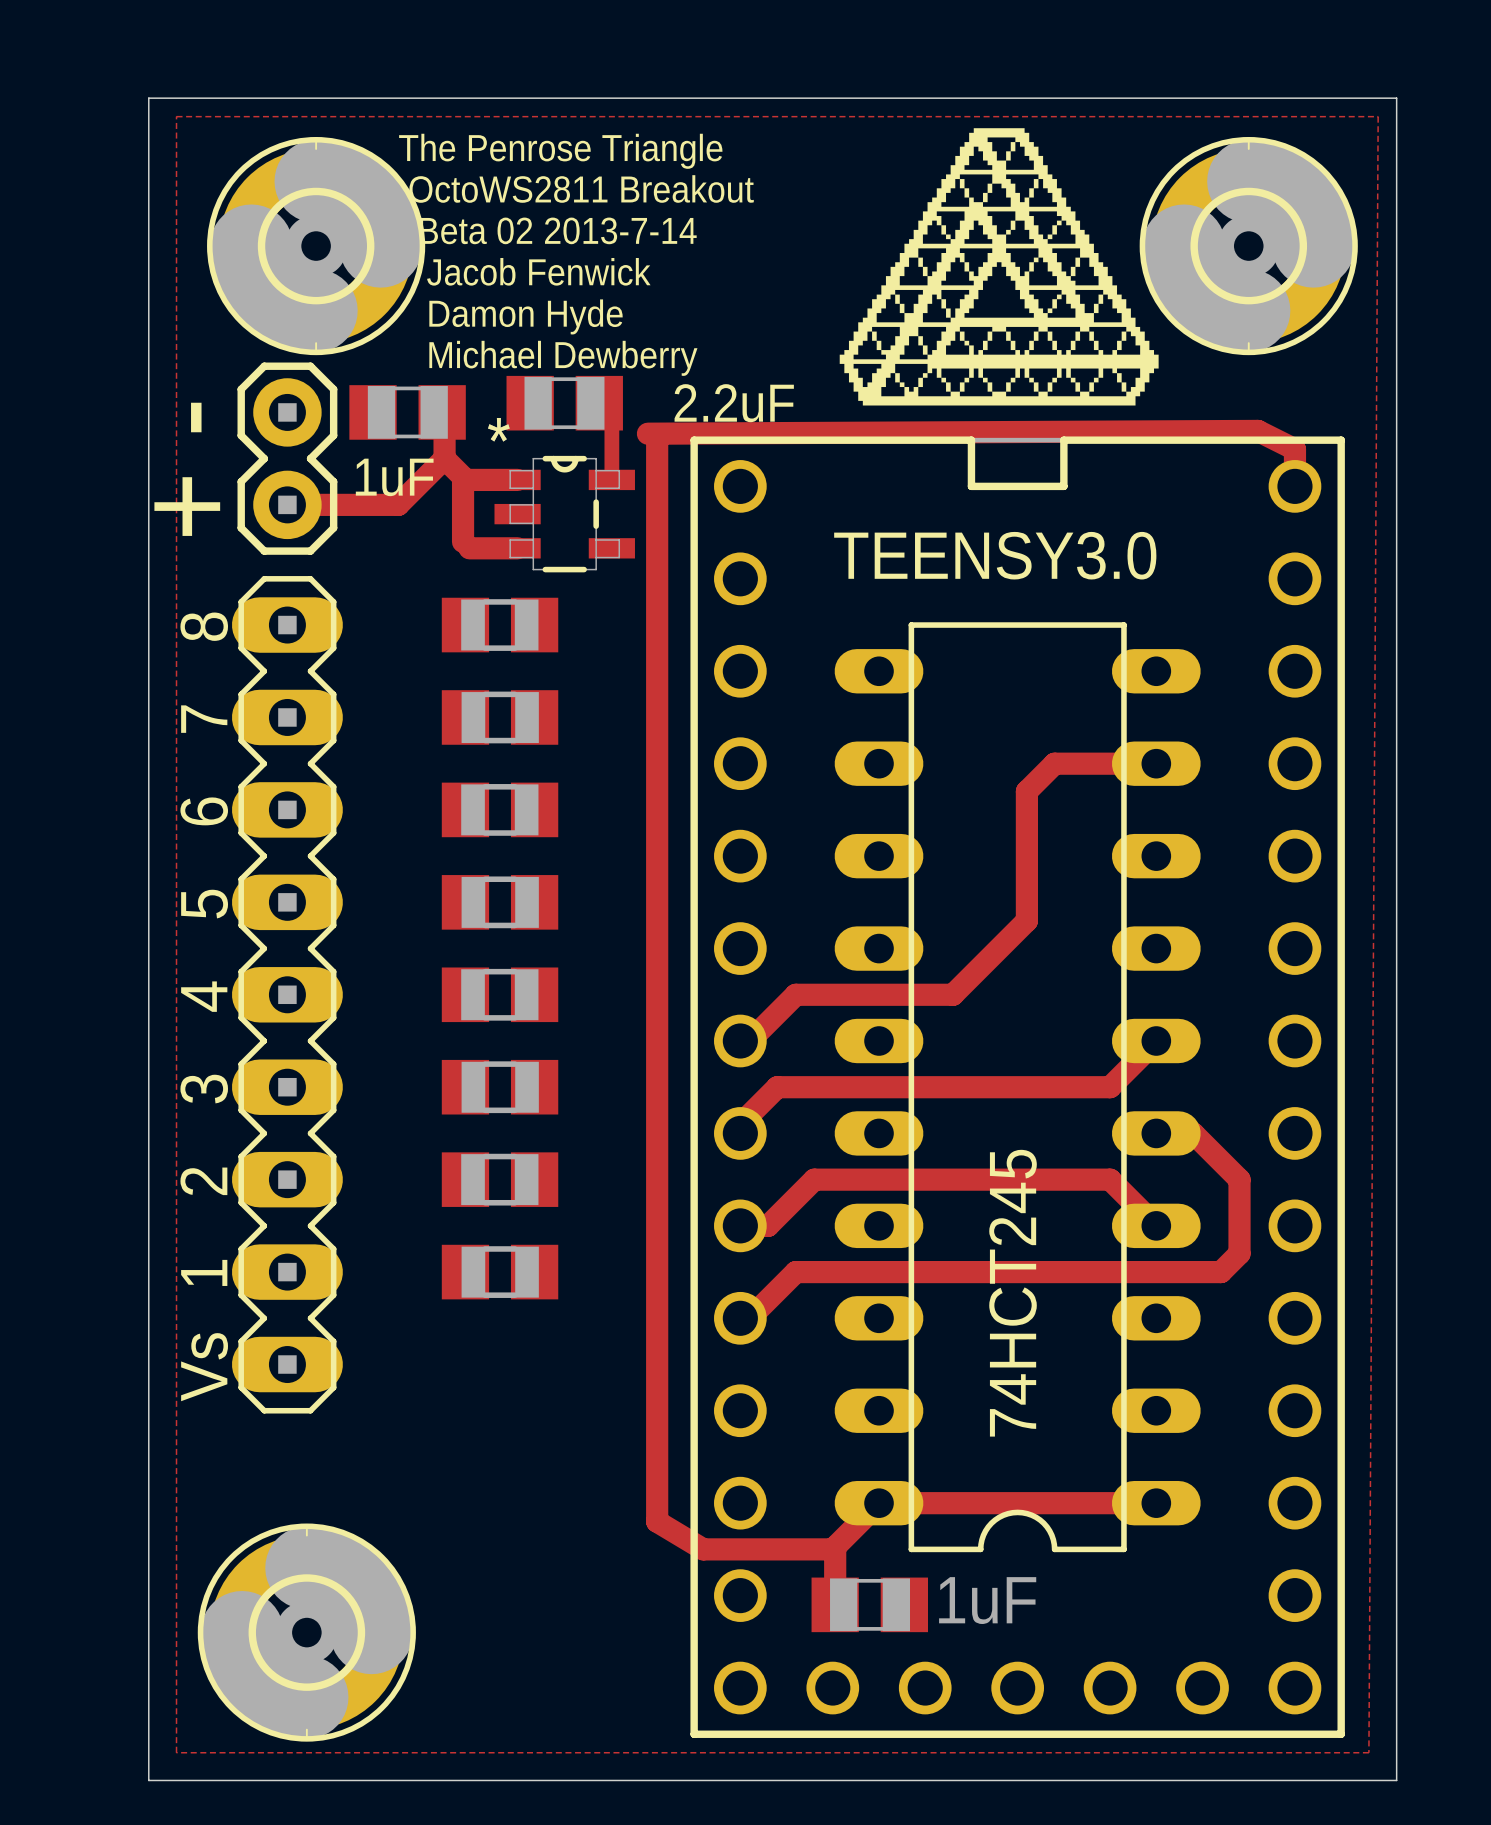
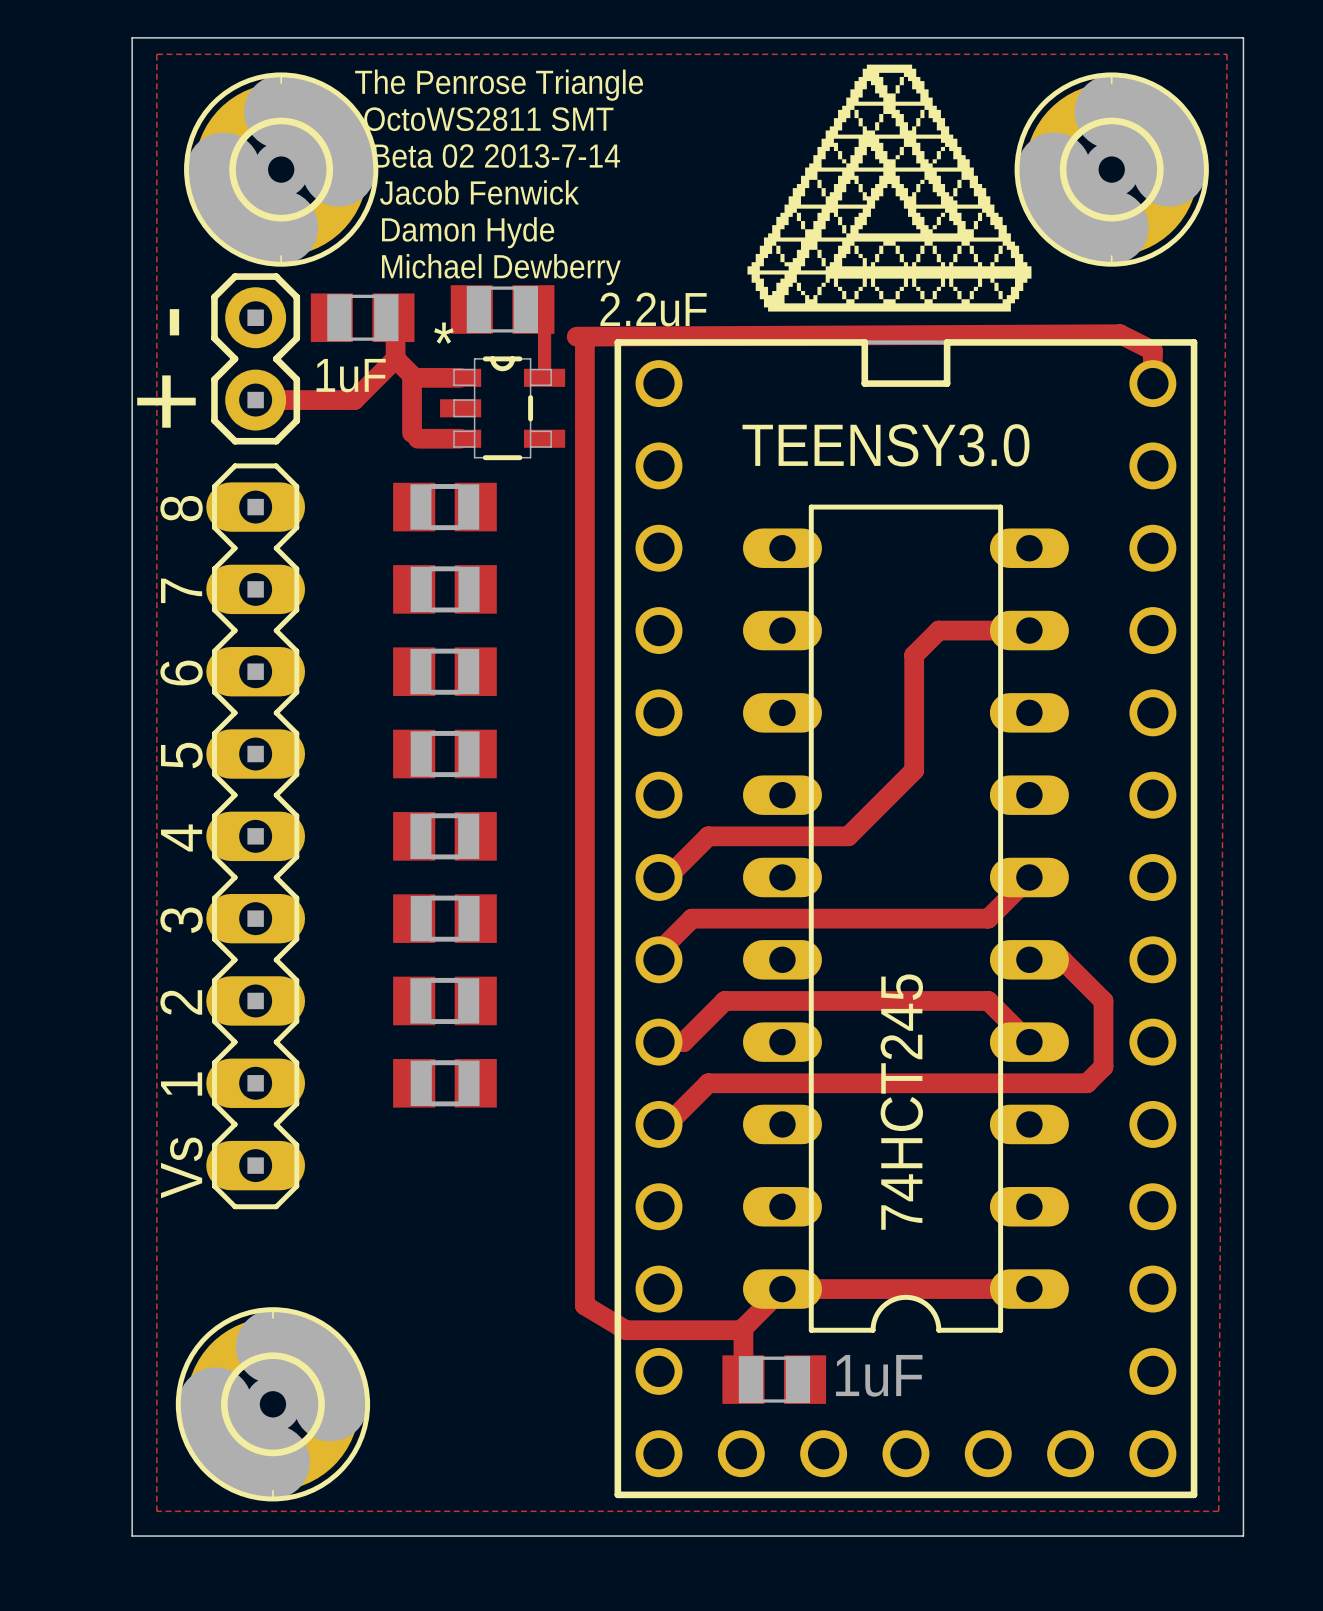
text: OctoWS2811 Breakout (581, 188) -> OctoWS2811 SMT (488, 119)

